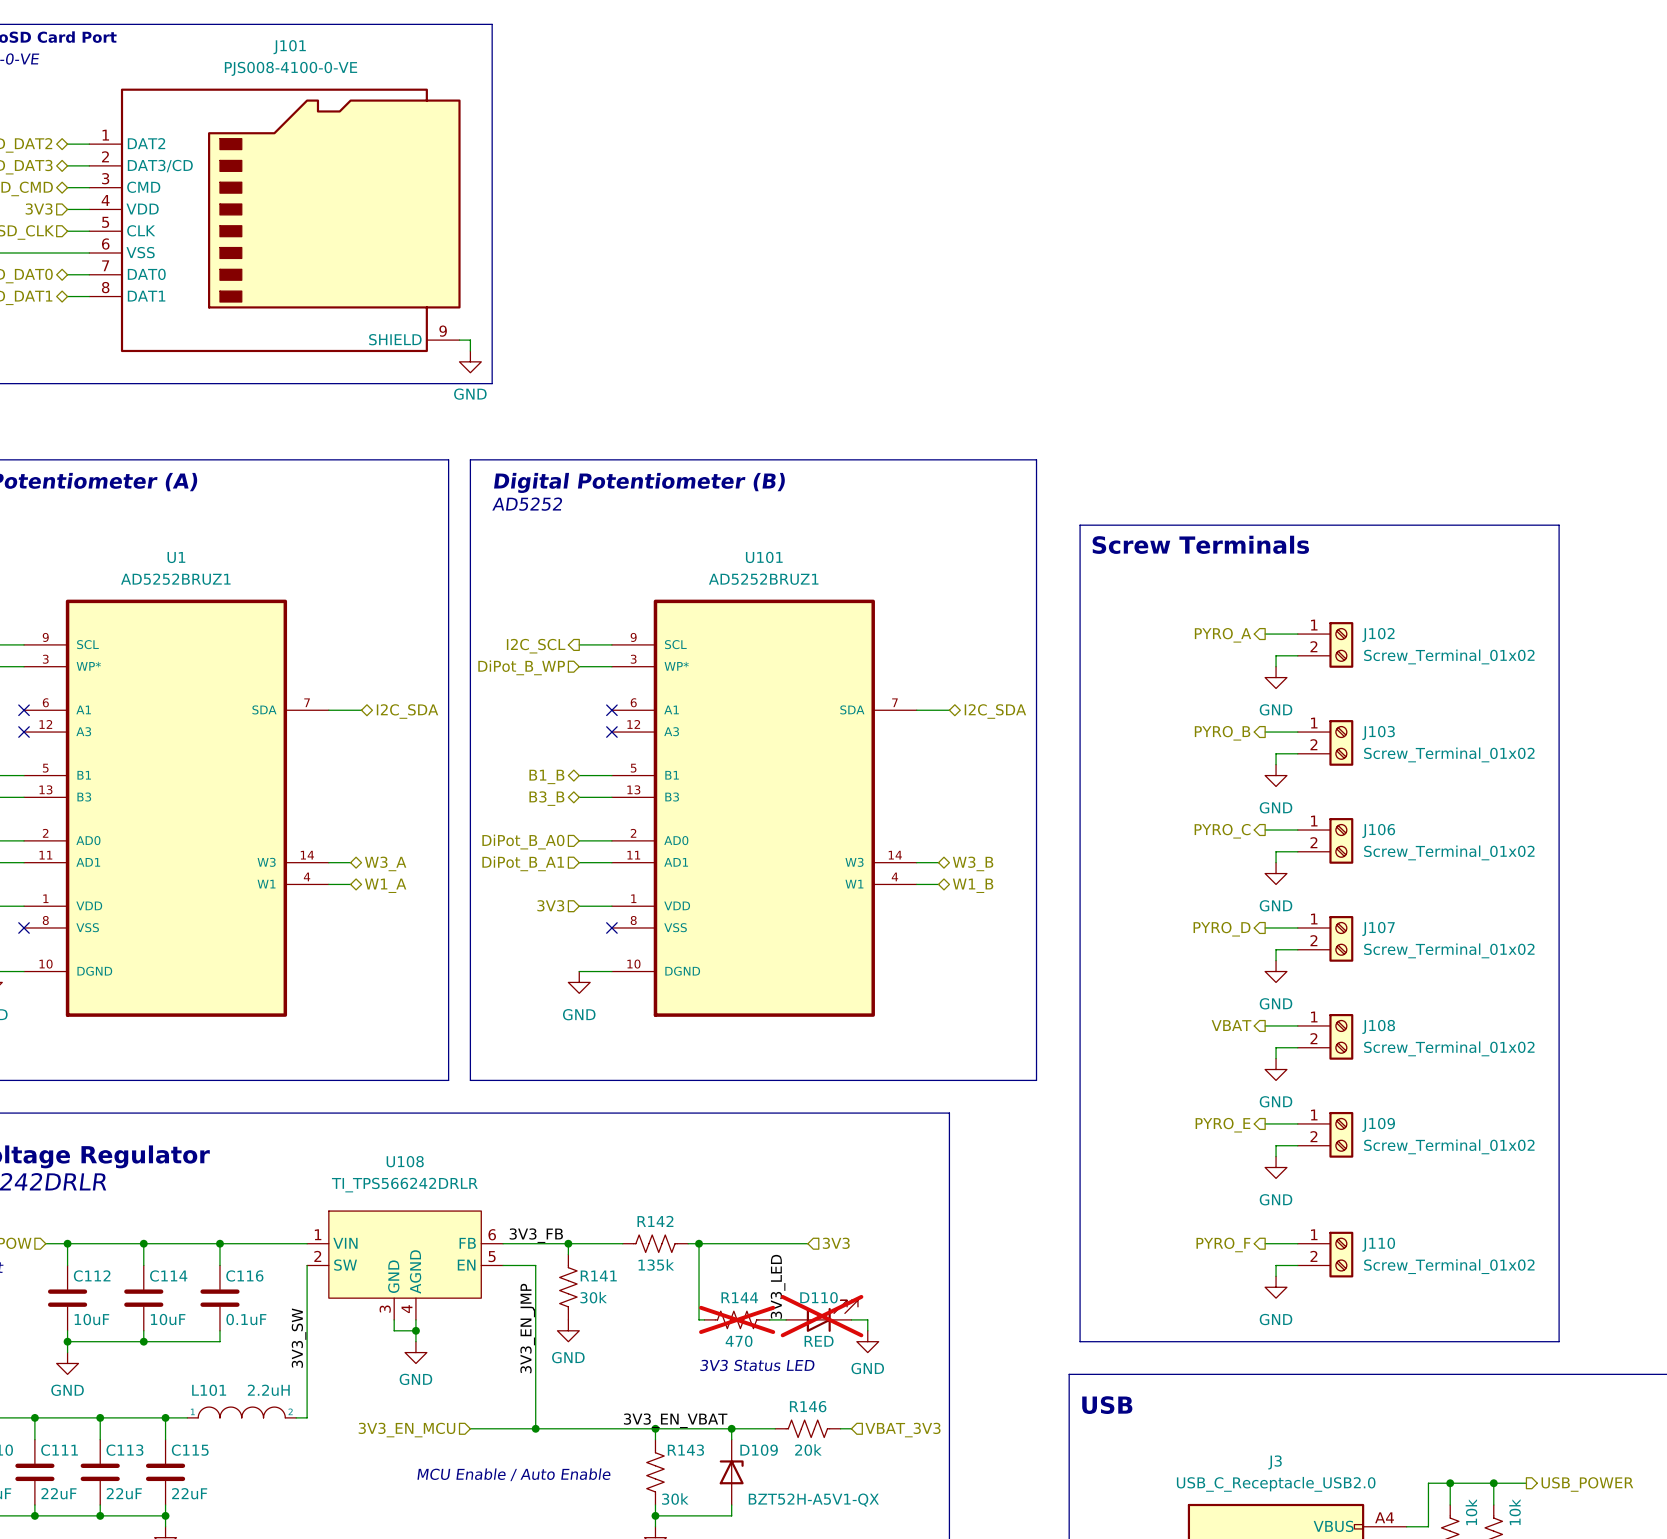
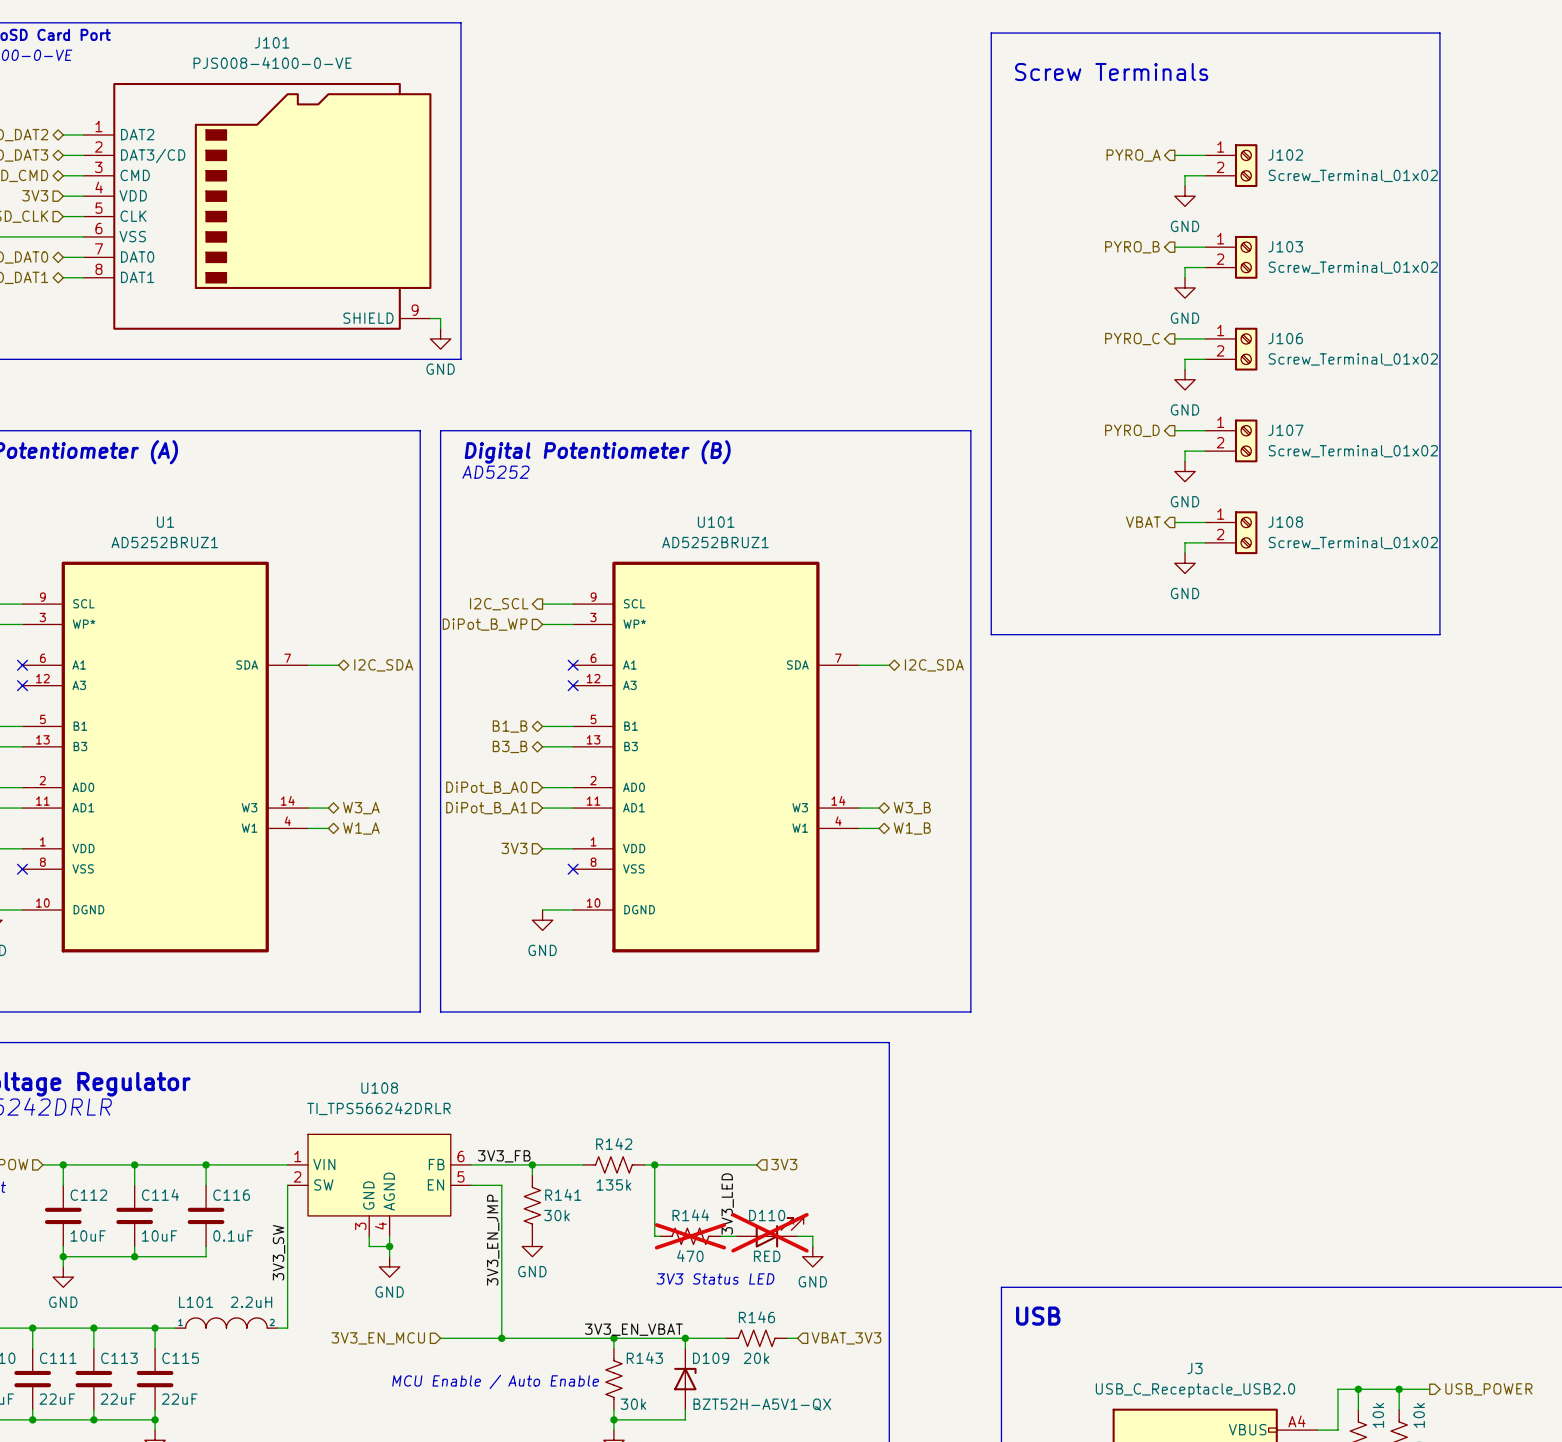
line: none -> (991, 33) (1439, 33) (1439, 634) (991, 634) (991, 33)
text: none -> Screw Terminals (1111, 72)
wire: none -> (1174, 155) (1205, 155)
hierarchical label: none -> PYRO_A (1133, 155)
wire: none -> (1205, 175) (1185, 175) (1185, 185)
power symbol: none -> GND (1185, 196)
wire: none -> (1174, 247) (1205, 247)
hierarchical label: none -> PYRO_B (1132, 247)
wire: none -> (1205, 267) (1185, 267) (1185, 277)
power symbol: none -> GND (1185, 287)
wire: none -> (1174, 338) (1205, 338)
hierarchical label: none -> PYRO_C (1132, 339)
wire: none -> (1205, 359) (1185, 359) (1185, 369)
power symbol: none -> GND (1185, 379)
hierarchical label: none -> PYRO_D (1132, 430)
power symbol: none -> GND (1185, 471)
line: (1080, 525) (1559, 525) (1559, 1341) (1080, 1341) (1080, 525) -> none
text: Screw Terminals (1200, 544) -> none
hierarchical label: none -> VBAT (1143, 522)
wire: (1265, 634) (1297, 634) -> (1174, 430) (1205, 430)
hierarchical label: PYRO_A (1223, 635) -> none
J102 position: (1325, 644) -> (1231, 165)
wire: (1297, 655) (1276, 655) (1276, 666) -> (1205, 451) (1185, 451) (1185, 461)
power symbol position: GND (1276, 677) -> GND (1185, 563)
wire: (1265, 732) (1297, 732) -> (1174, 522) (1205, 522)
hierarchical label: PYRO_B (1222, 733) -> none
J103 position: (1325, 742) -> (1231, 257)
wire: (1297, 753) (1276, 753) (1276, 764) -> (1205, 542) (1185, 542) (1185, 553)
power symbol: GND (1276, 775) -> none
wire: (1265, 830) (1297, 830) -> none
hierarchical label: PYRO_C (1222, 831) -> none
J106 position: (1325, 840) -> (1231, 349)
wire: (1297, 851) (1276, 851) (1276, 862) -> none
power symbol: GND (1276, 873) -> none
wire: (1265, 927) (1297, 927) -> none
hierarchical label: PYRO_D (1222, 929) -> none
J107 position: (1325, 938) -> (1231, 440)
wire: (1297, 949) (1276, 949) (1276, 960) -> none
power symbol: GND (1276, 971) -> none
hierarchical label: VBAT (1231, 1025) -> none
wire: (1265, 1025) (1297, 1025) -> none
J108 position: (1325, 1036) -> (1231, 532)
wire: (1297, 1047) (1276, 1047) (1276, 1058) -> none
power symbol: GND (1276, 1069) -> none
wire: (1265, 1123) (1297, 1123) -> none
hierarchical label: PYRO_E (1222, 1125) -> none
J109: Screw_Terminal_01x02 (1325, 1134) -> none
wire: (1297, 1145) (1276, 1145) (1276, 1156) -> none
power symbol: GND (1276, 1167) -> none
wire: (1265, 1243) (1297, 1243) -> none
hierarchical label: PYRO_F (1223, 1244) -> none
J110: Screw_Terminal_01x02 (1325, 1254) -> none
wire: (1297, 1265) (1276, 1265) (1276, 1276) -> none
power symbol: GND (1276, 1287) -> none

